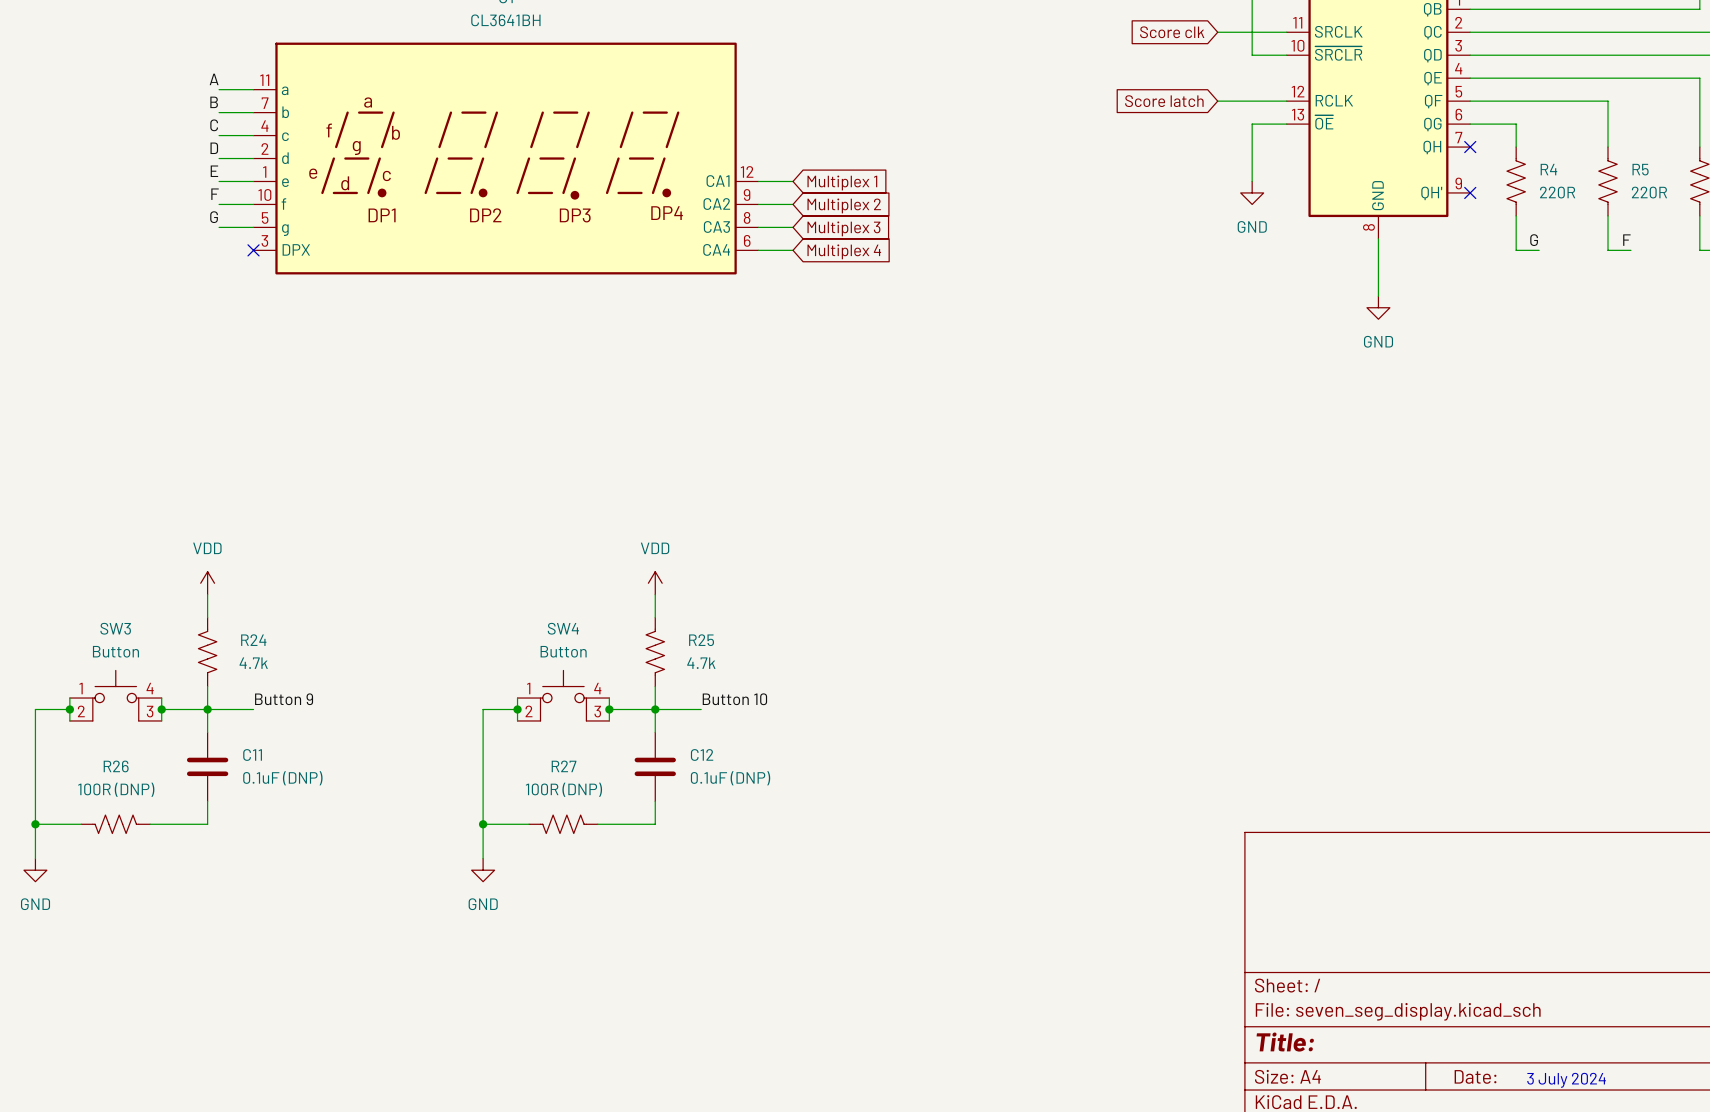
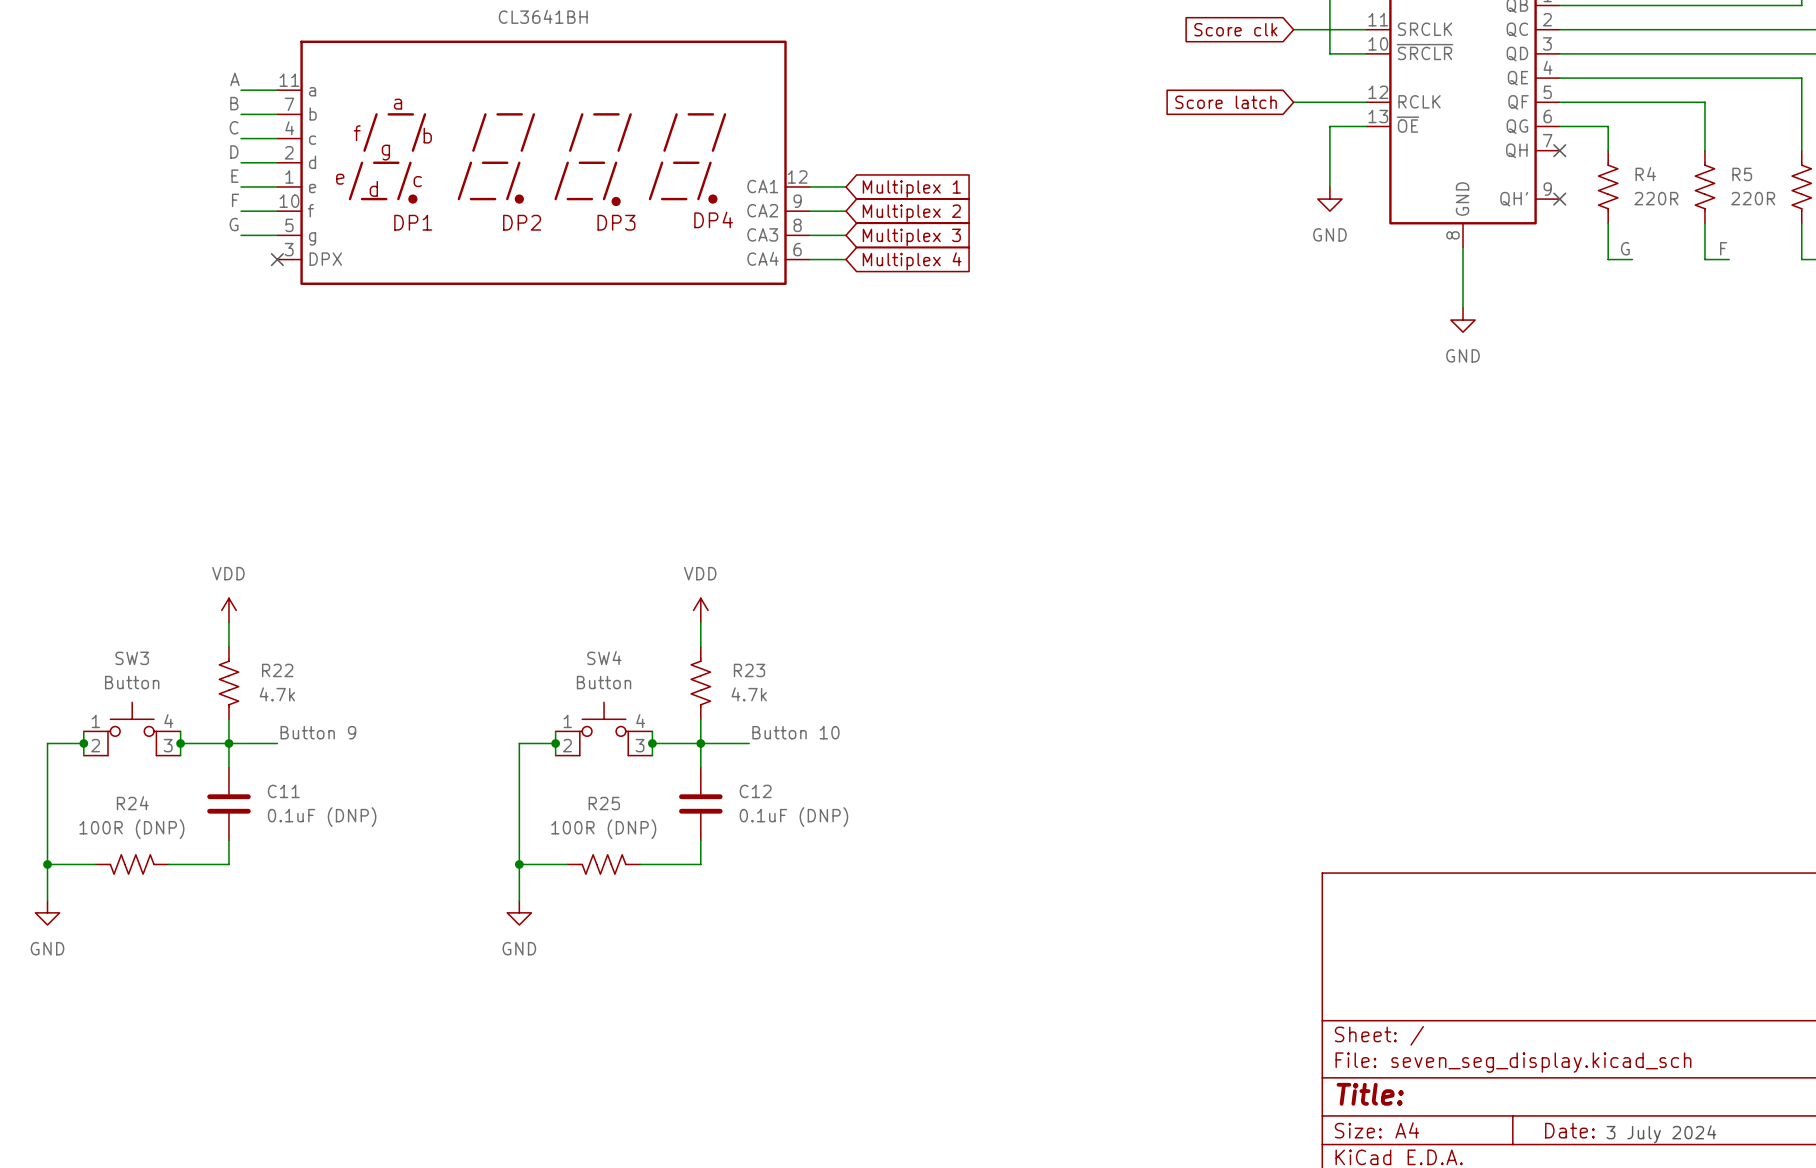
R24 name: R24 (253, 640) -> R22 (277, 670)
R25 name: R25 (701, 640) -> R23 (749, 670)
R26 name: R26 (116, 766) -> R24 (132, 803)
R27 name: R27 (564, 766) -> R25 (604, 803)

